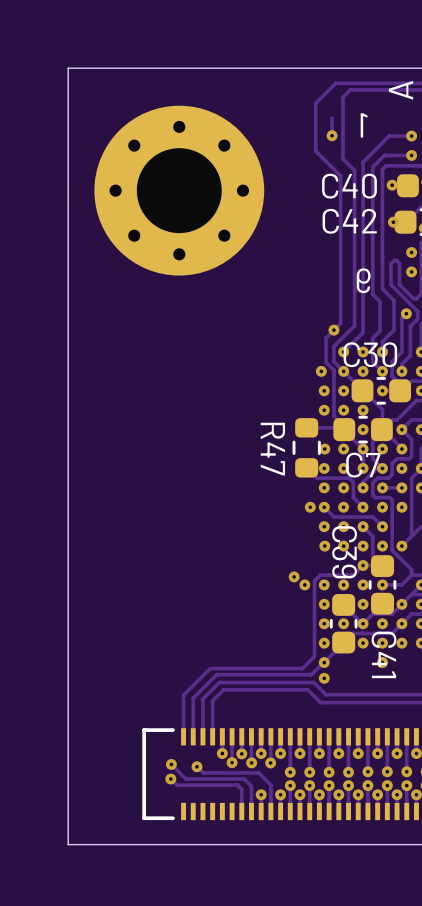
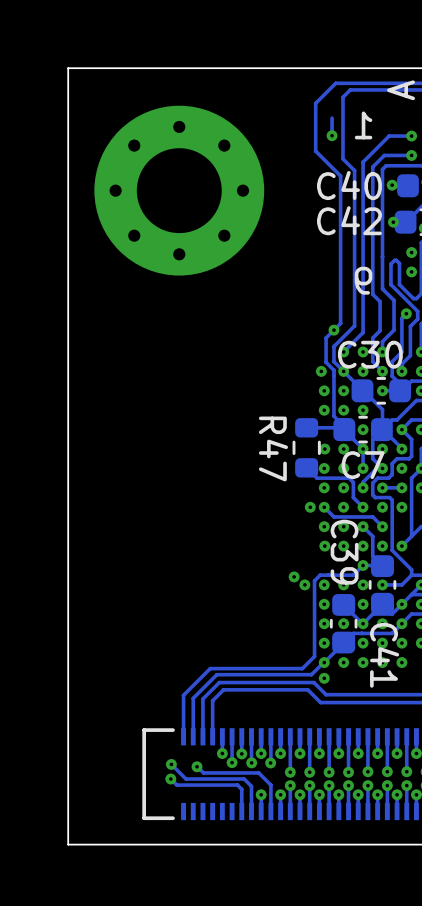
via: none -> (343, 662)
via: none -> (363, 662)
via: none -> (401, 662)

